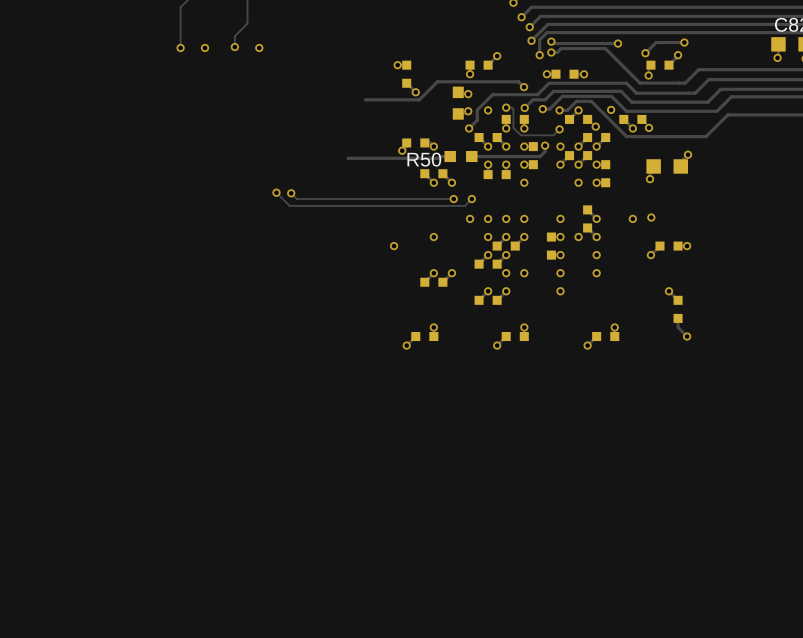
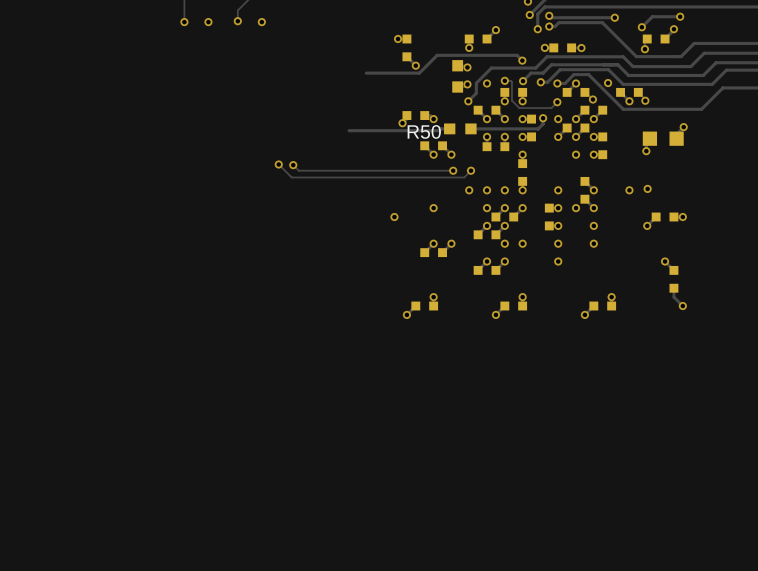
part: none -> (522, 172)

